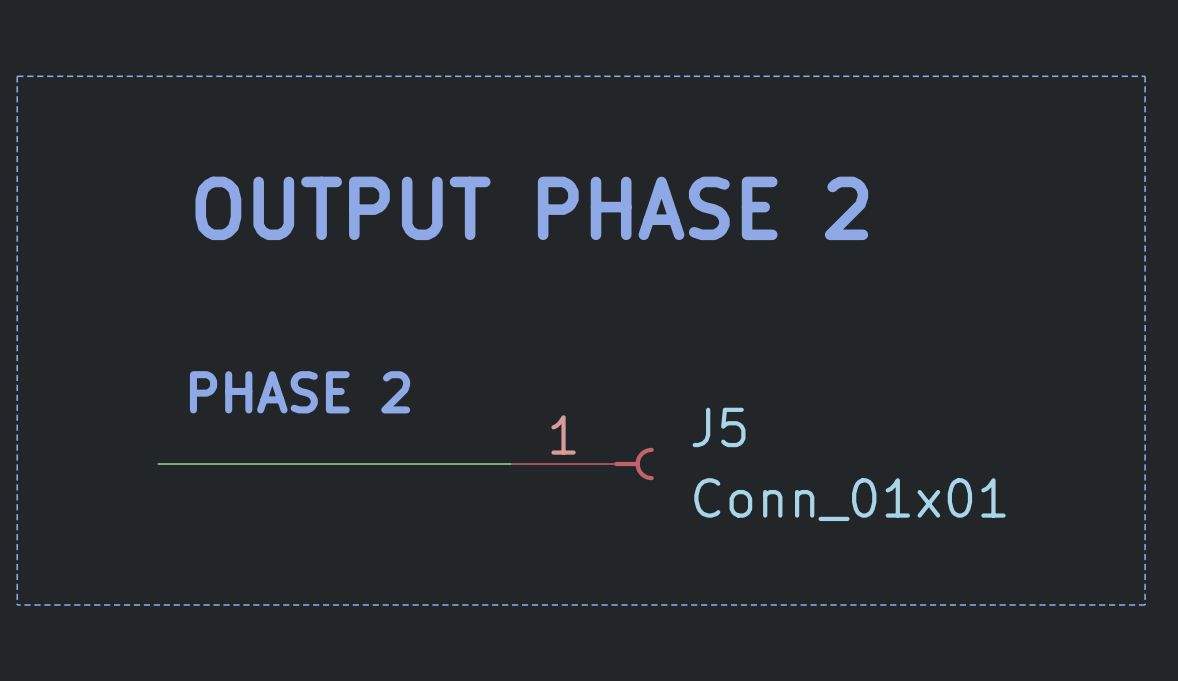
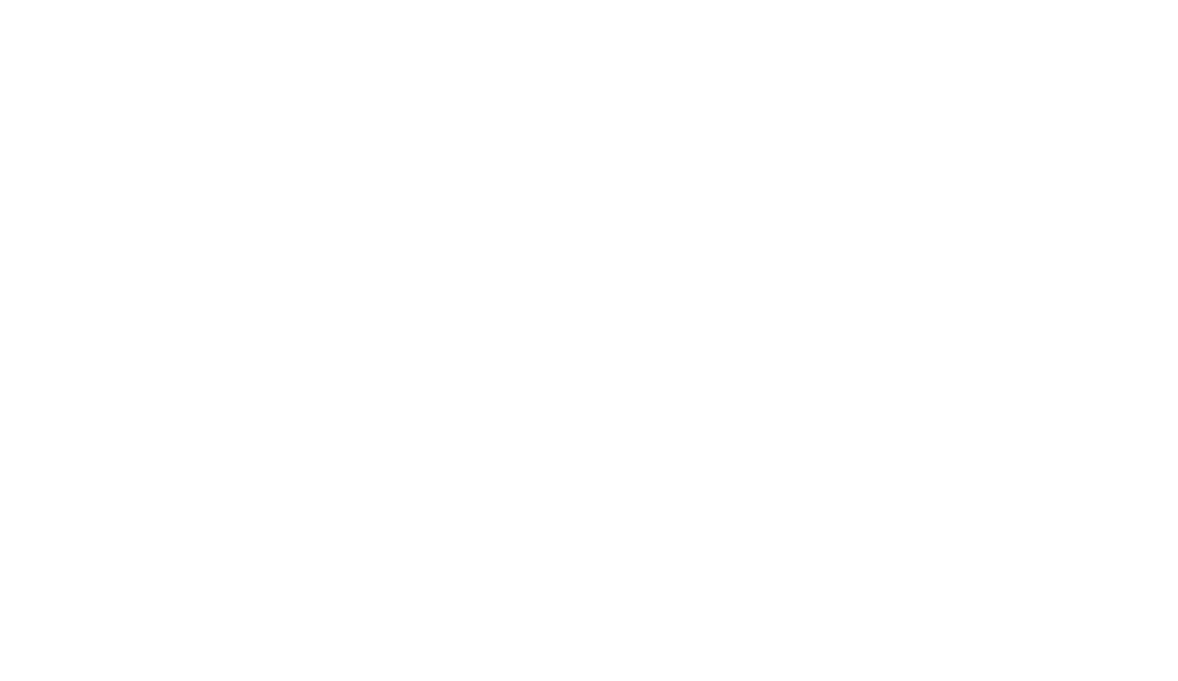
line: (17, 76) (17, 604) (1145, 604) (1145, 76) (17, 76) -> none
text: OUTPUT PHASE 2 (531, 208) -> none
text: PHASE 2 (300, 392) -> none
wire: (158, 464) (510, 464) -> none
J5: Conn_01x01 (582, 464) -> none

